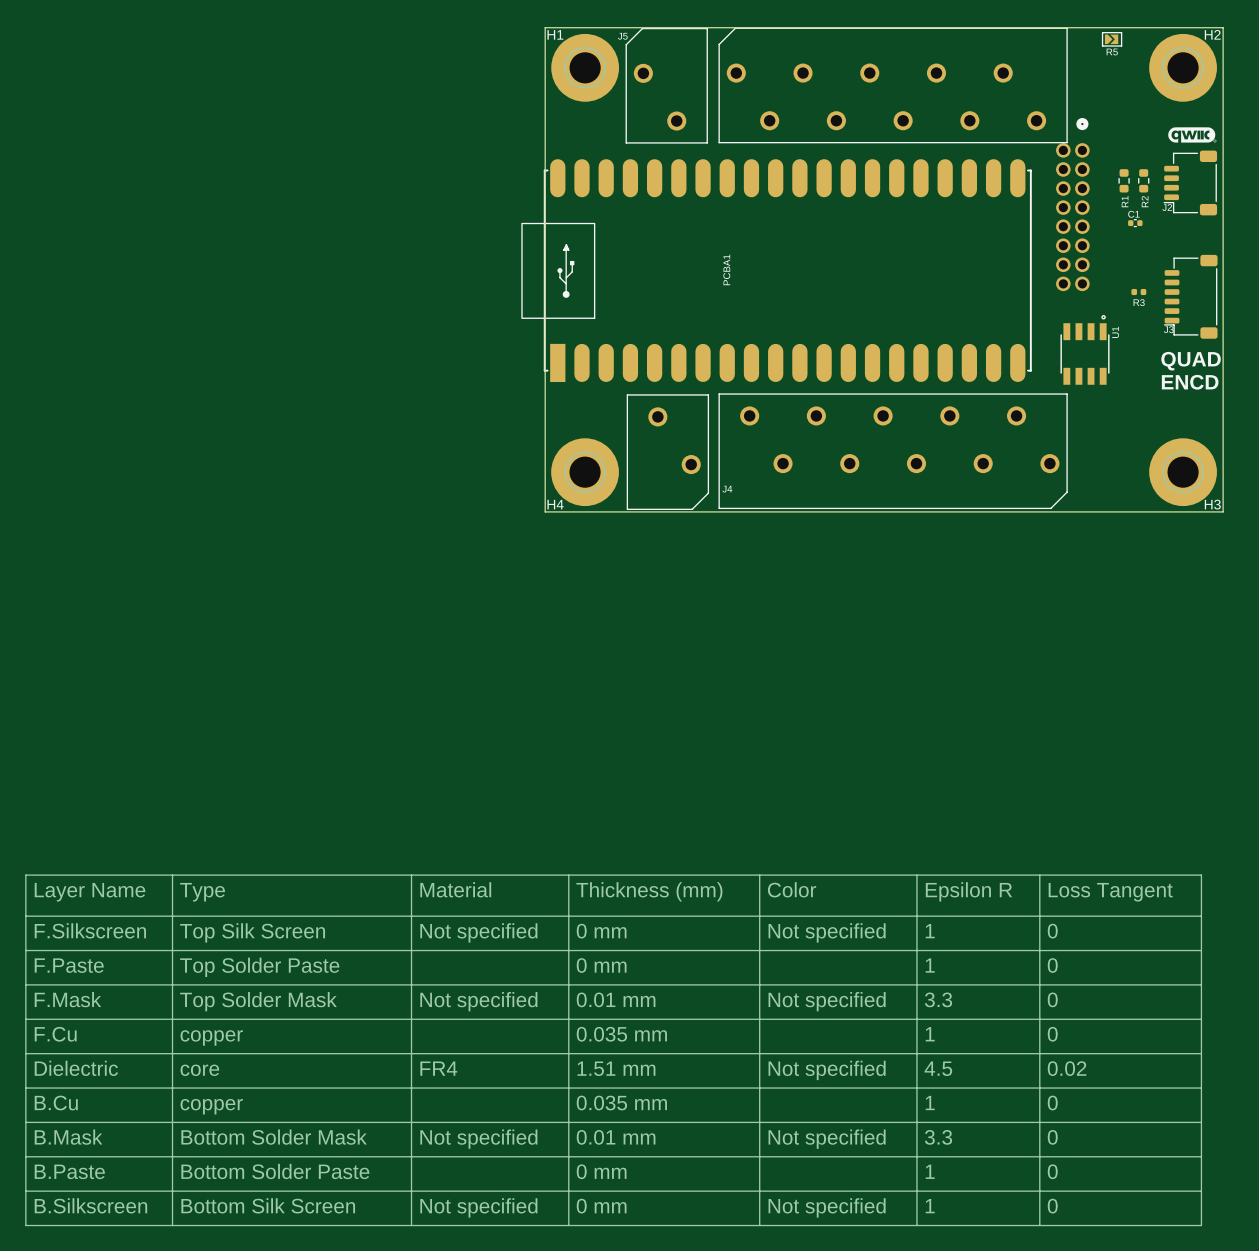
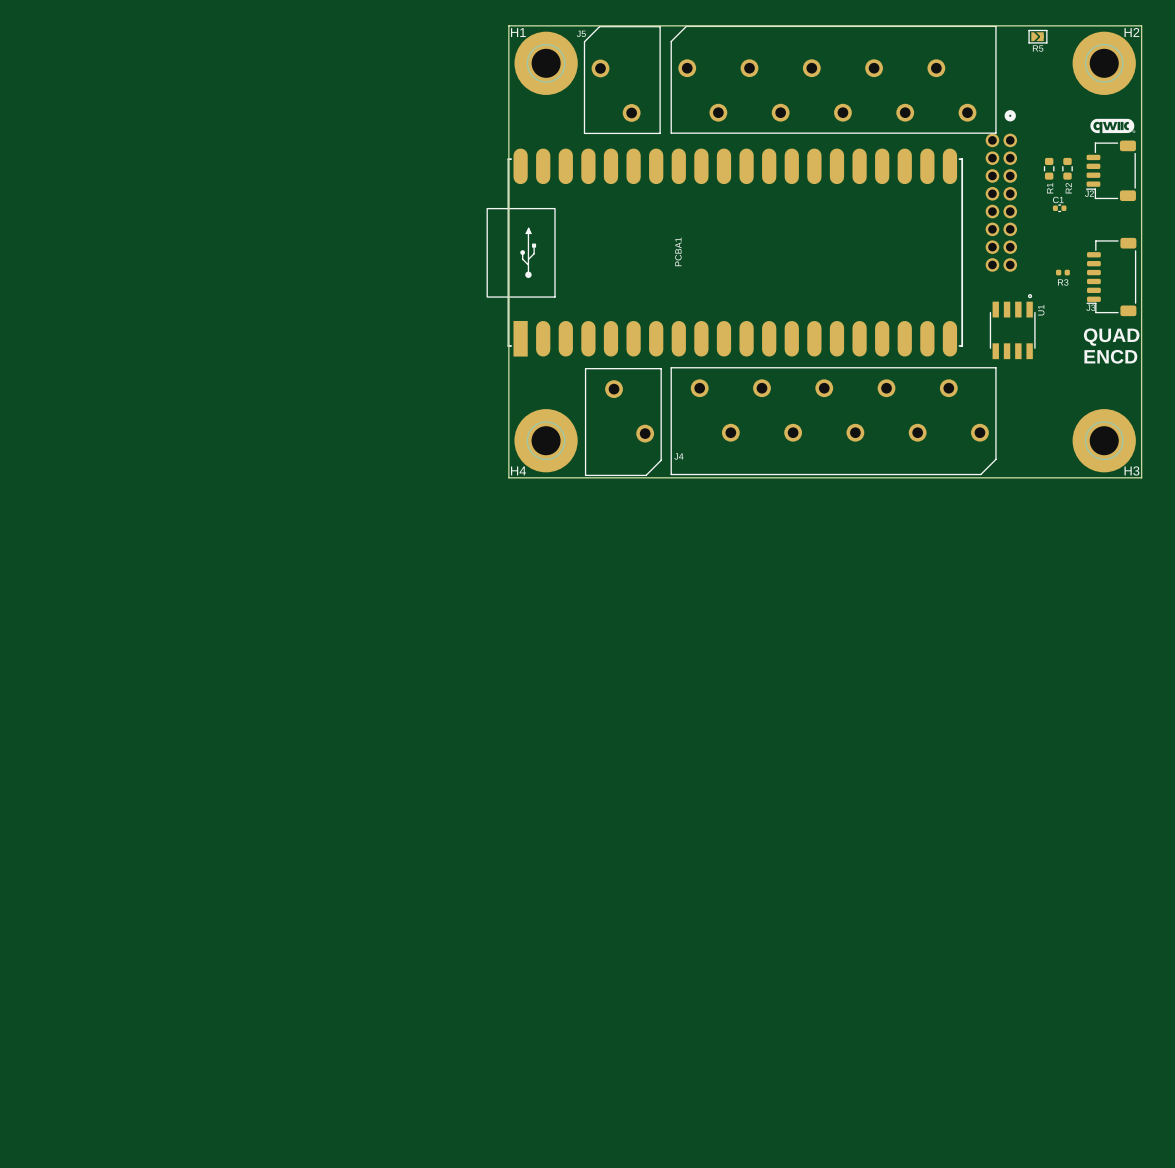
line: (25, 875) (25, 1225) (1201, 1225) (1201, 875) (25, 875) -> none
line: (172, 875) (172, 1225) -> none
line: (411, 875) (411, 1225) -> none
line: (568, 875) (568, 1225) -> none
line: (759, 875) (759, 1225) -> none
line: (916, 875) (916, 1225) -> none
line: (1039, 875) (1039, 1225) -> none
text: Material (455, 889) -> none
text: Color (792, 889) -> none
text: Thickness (mm) (649, 891) -> none
text: Epsilon R (968, 891) -> none
text: Layer Name (90, 892) -> none
text: Type (202, 892) -> none
text: Loss Tangent (1110, 892) -> none
line: (25, 916) (1201, 916) -> none
text: F.Silkscreen (90, 930) -> none
text: 0 mm (601, 931) -> none
text: 1 (930, 931) -> none
text: 0 (1052, 931) -> none
text: Top Silk Screen (252, 932) -> none
text: Not specified (478, 932) -> none
text: Not specified (827, 932) -> none
line: (25, 950) (1201, 950) -> none
text: F.Paste (69, 965) -> none
text: 0 mm (601, 965) -> none
text: 1 (930, 965) -> none
text: 0 (1052, 965) -> none
text: Top Solder Paste (259, 967) -> none
line: (25, 984) (1201, 984) -> none
text: F.Mask (67, 999) -> none
text: 0.01 mm (616, 999) -> none
text: 3.3 (938, 999) -> none
text: 0 (1052, 999) -> none
text: Top Solder Mask (258, 1001) -> none
text: Not specified (478, 1001) -> none
text: Not specified (827, 1001) -> none
line: (25, 1019) (1201, 1019) -> none
text: F.Cu (55, 1034) -> none
text: 0.035 mm (621, 1034) -> none
text: 1 (930, 1034) -> none
text: 0 (1052, 1034) -> none
text: copper (211, 1037) -> none
line: (25, 1053) (1201, 1053) -> none
text: Dielectric (76, 1068) -> none
text: FR4 (438, 1068) -> none
text: 1.51 mm (616, 1068) -> none
text: 4.5 (938, 1068) -> none
text: 0.02 (1067, 1068) -> none
text: core (199, 1070) -> none
text: Not specified (827, 1070) -> none
line: (25, 1088) (1201, 1088) -> none
text: B.Cu (56, 1103) -> none
text: 0.035 mm (621, 1103) -> none
text: 1 (930, 1103) -> none
text: 0 (1052, 1103) -> none
text: copper (211, 1106) -> none
line: (25, 1122) (1201, 1122) -> none
text: B.Mask (68, 1137) -> none
text: Bottom Solder Mask (274, 1137) -> none
text: 0.01 mm (616, 1137) -> none
text: 3.3 (938, 1137) -> none
text: 0 (1052, 1137) -> none
text: Not specified (478, 1139) -> none
text: Not specified (827, 1139) -> none
line: (25, 1156) (1201, 1156) -> none
text: B.Paste (69, 1171) -> none
text: Bottom Solder Paste (275, 1171) -> none
text: 0 mm (601, 1171) -> none
text: 1 (930, 1171) -> none
text: 0 (1052, 1171) -> none
line: (25, 1191) (1201, 1191) -> none
text: B.Silkscreen (90, 1205) -> none
text: Bottom Silk Screen (268, 1205) -> none
text: 0 mm (601, 1206) -> none
text: 1 (930, 1206) -> none
text: 0 (1052, 1206) -> none
text: Not specified (478, 1207) -> none
text: Not specified (827, 1207) -> none

